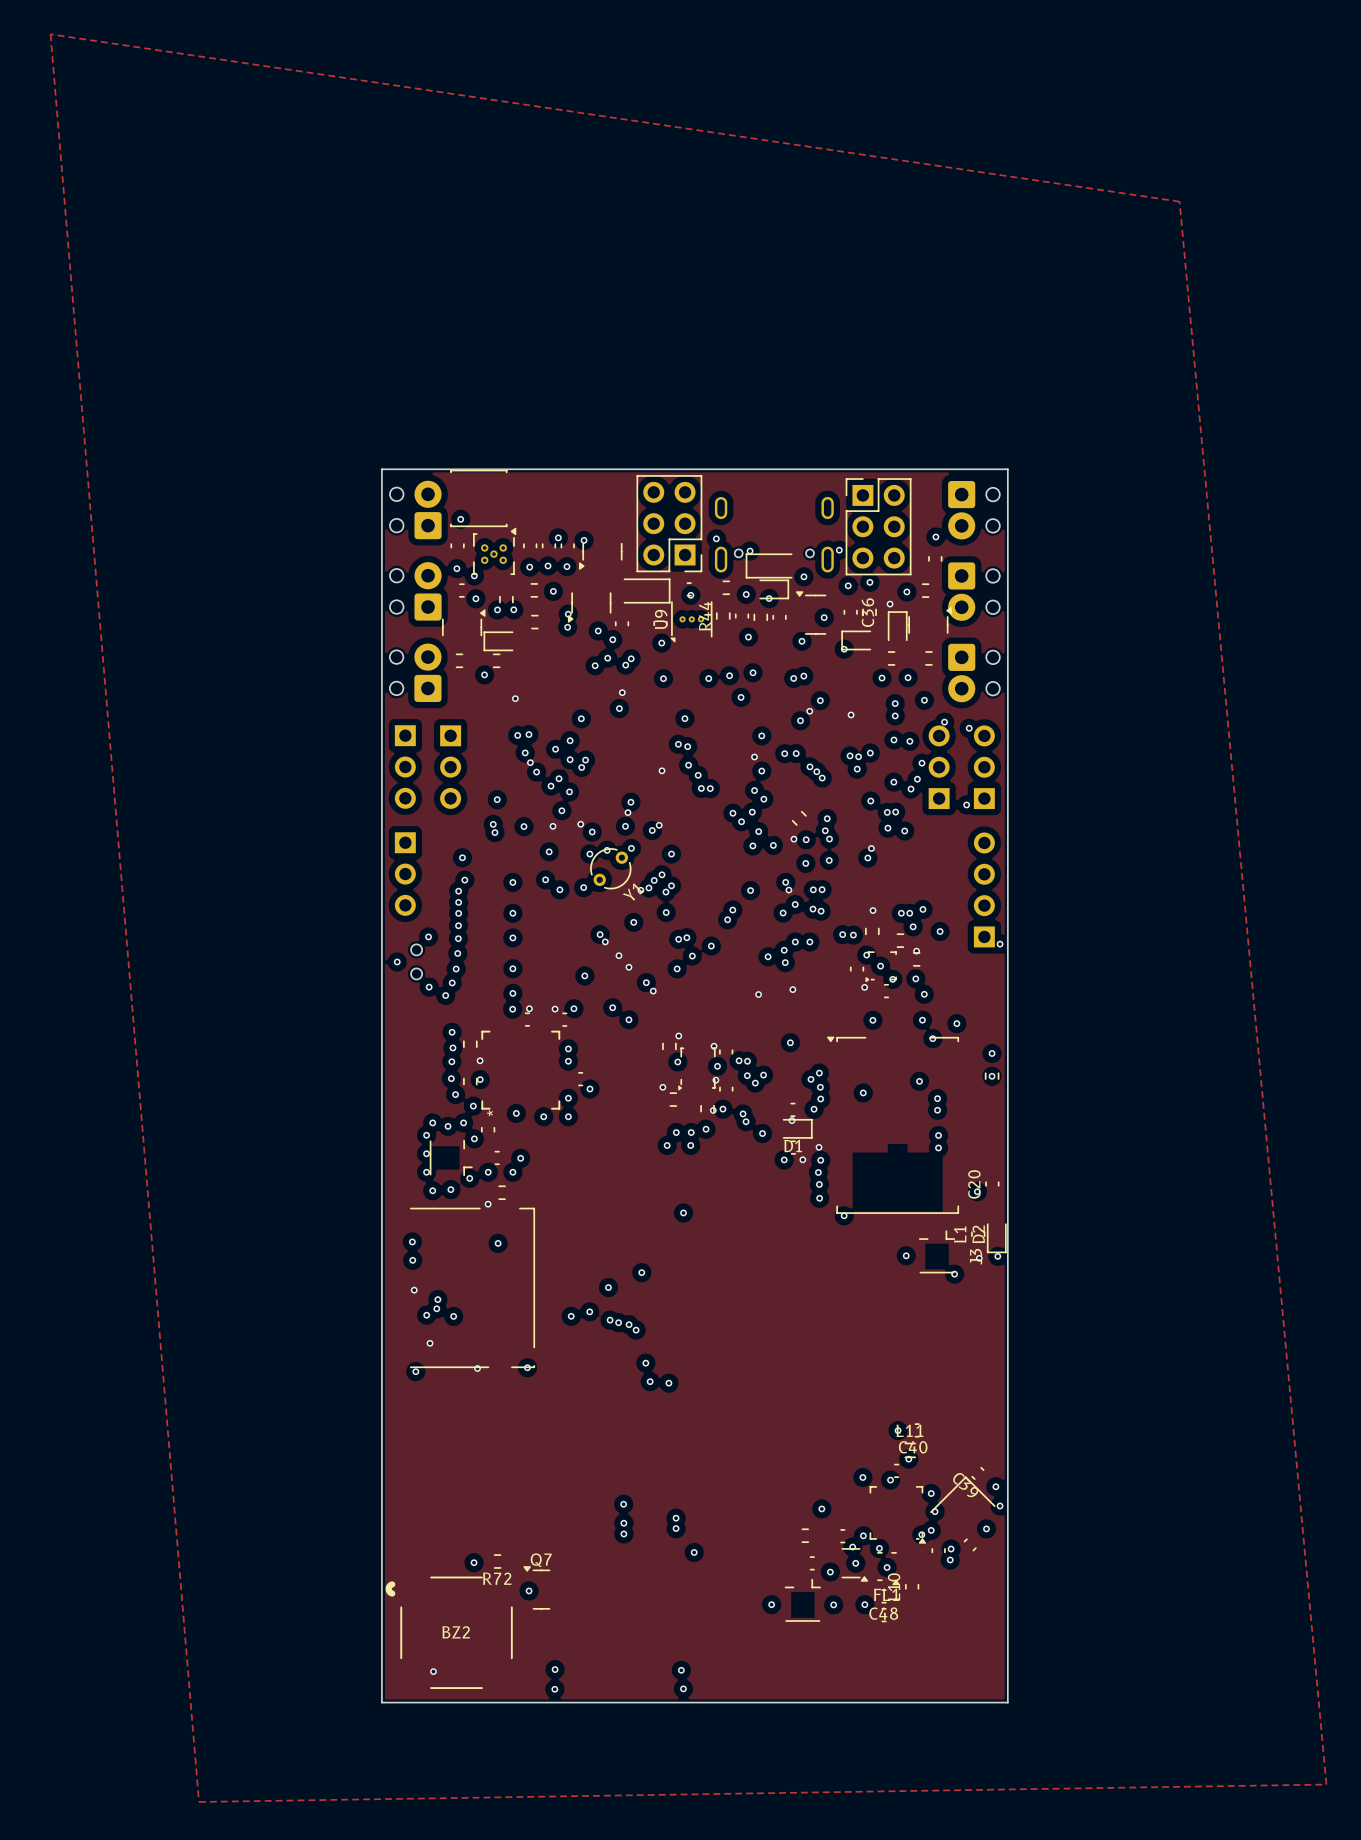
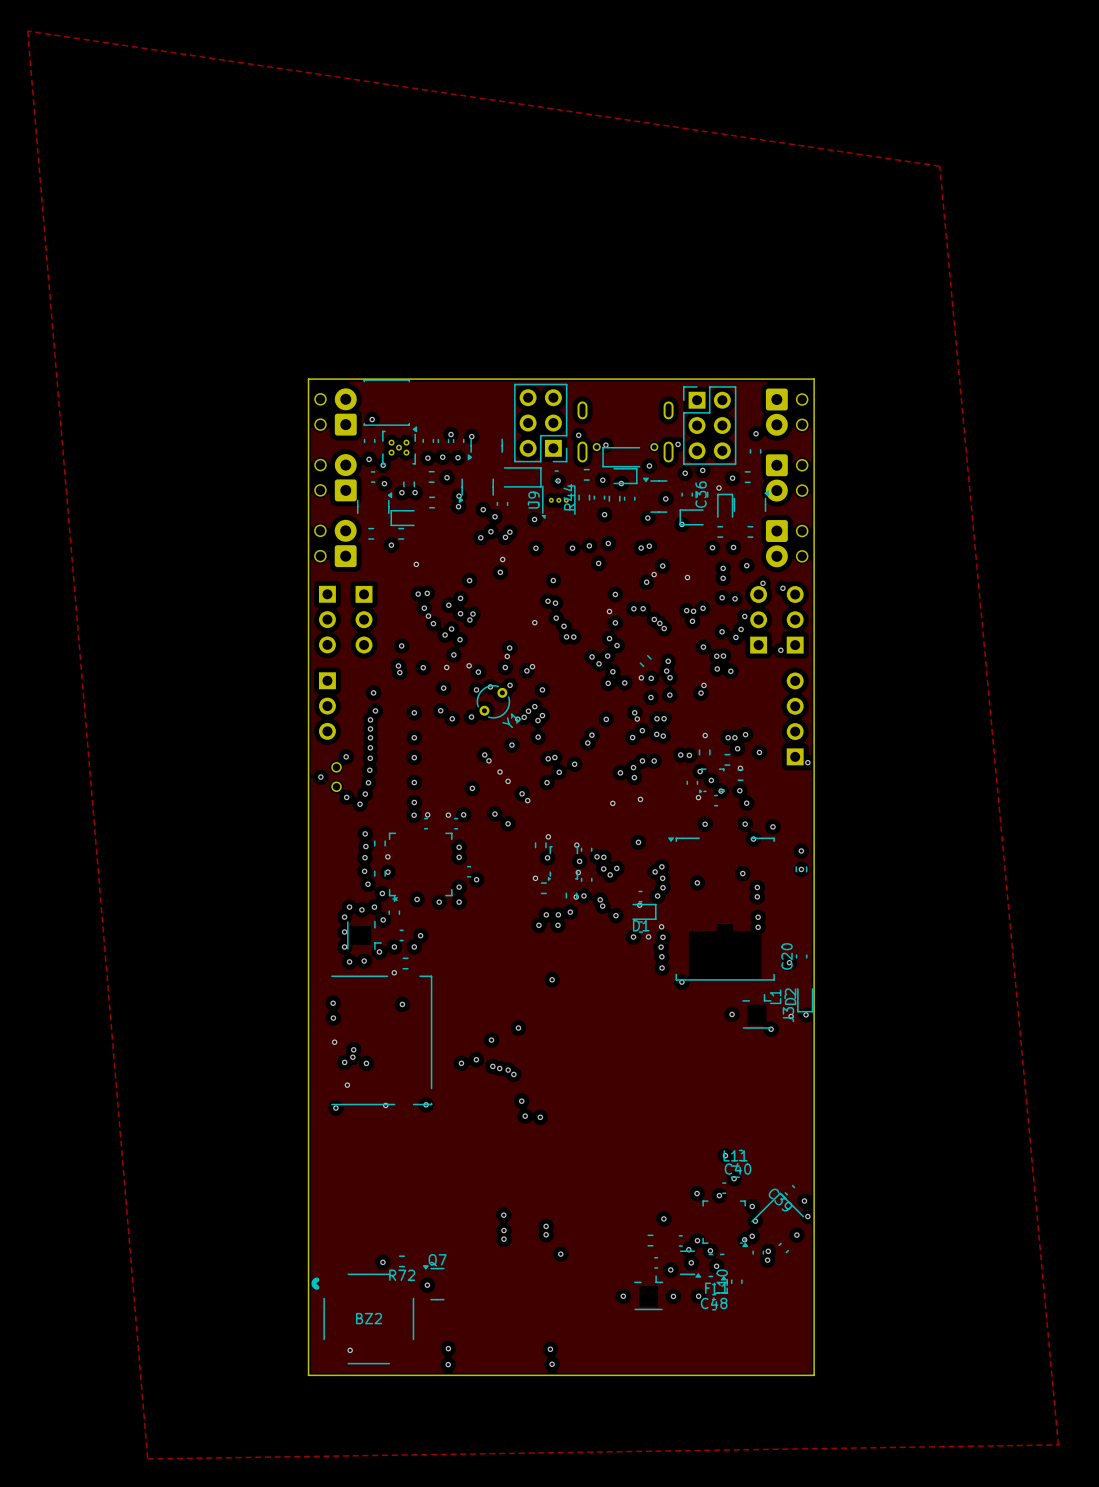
zone outline: (50, 34) (199, 1801) (1326, 1784) (1179, 201) (50, 34) -> (27, 31) (147, 1458) (1058, 1444) (939, 166) (27, 31)

